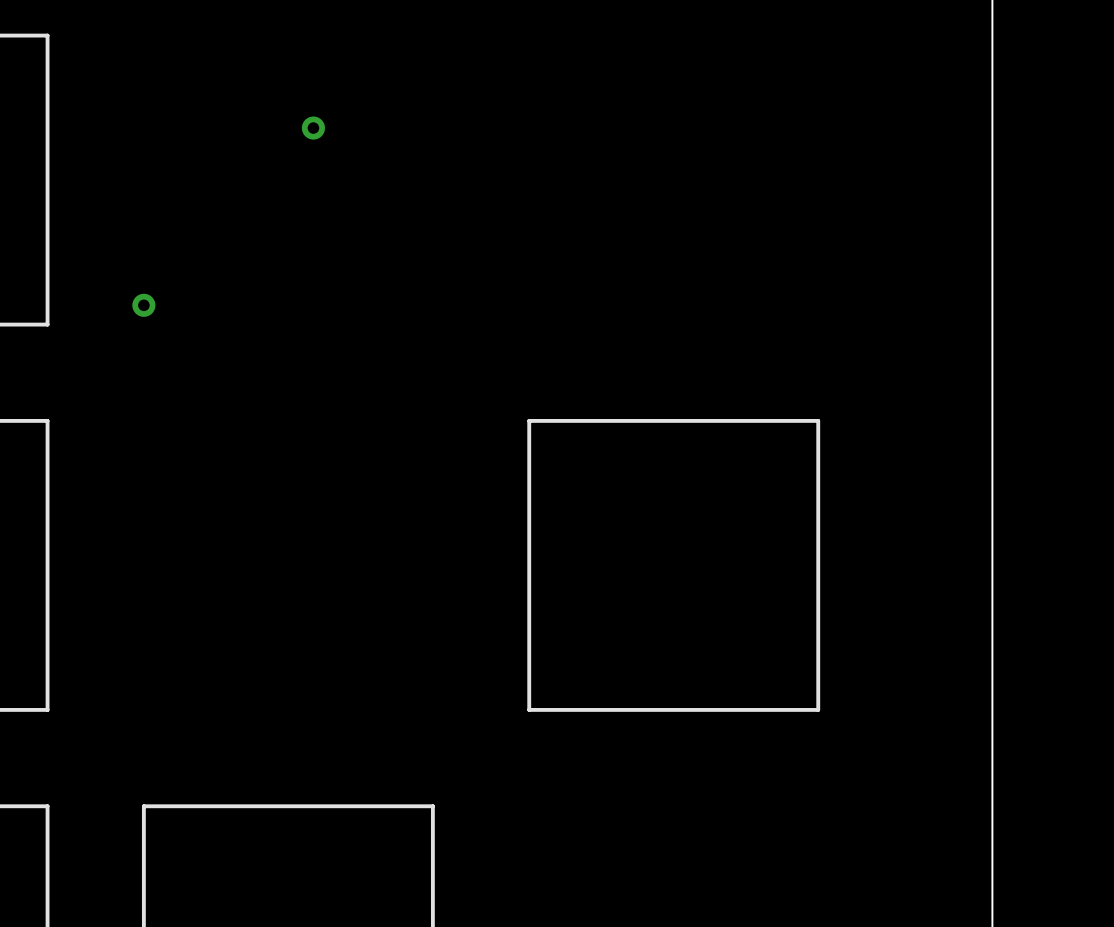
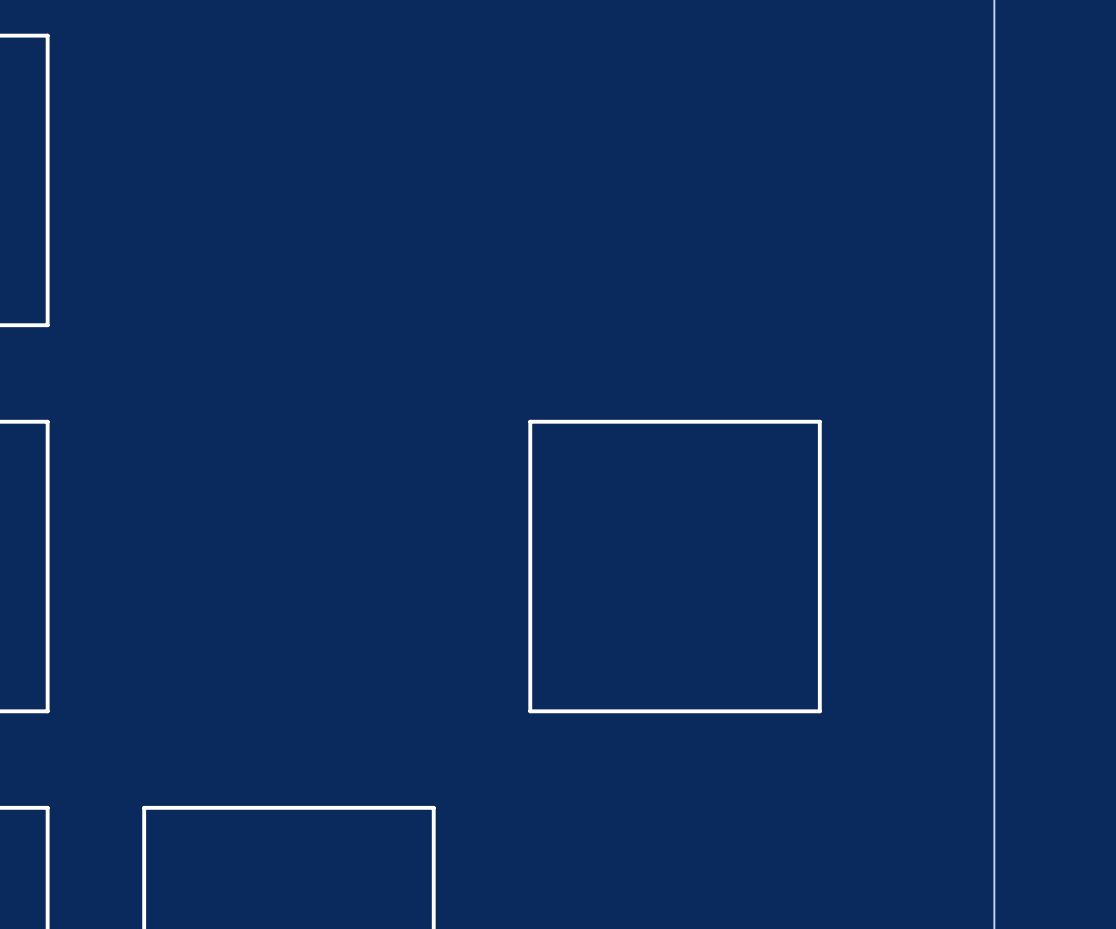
via: (313, 128) -> none
via: (143, 305) -> none

